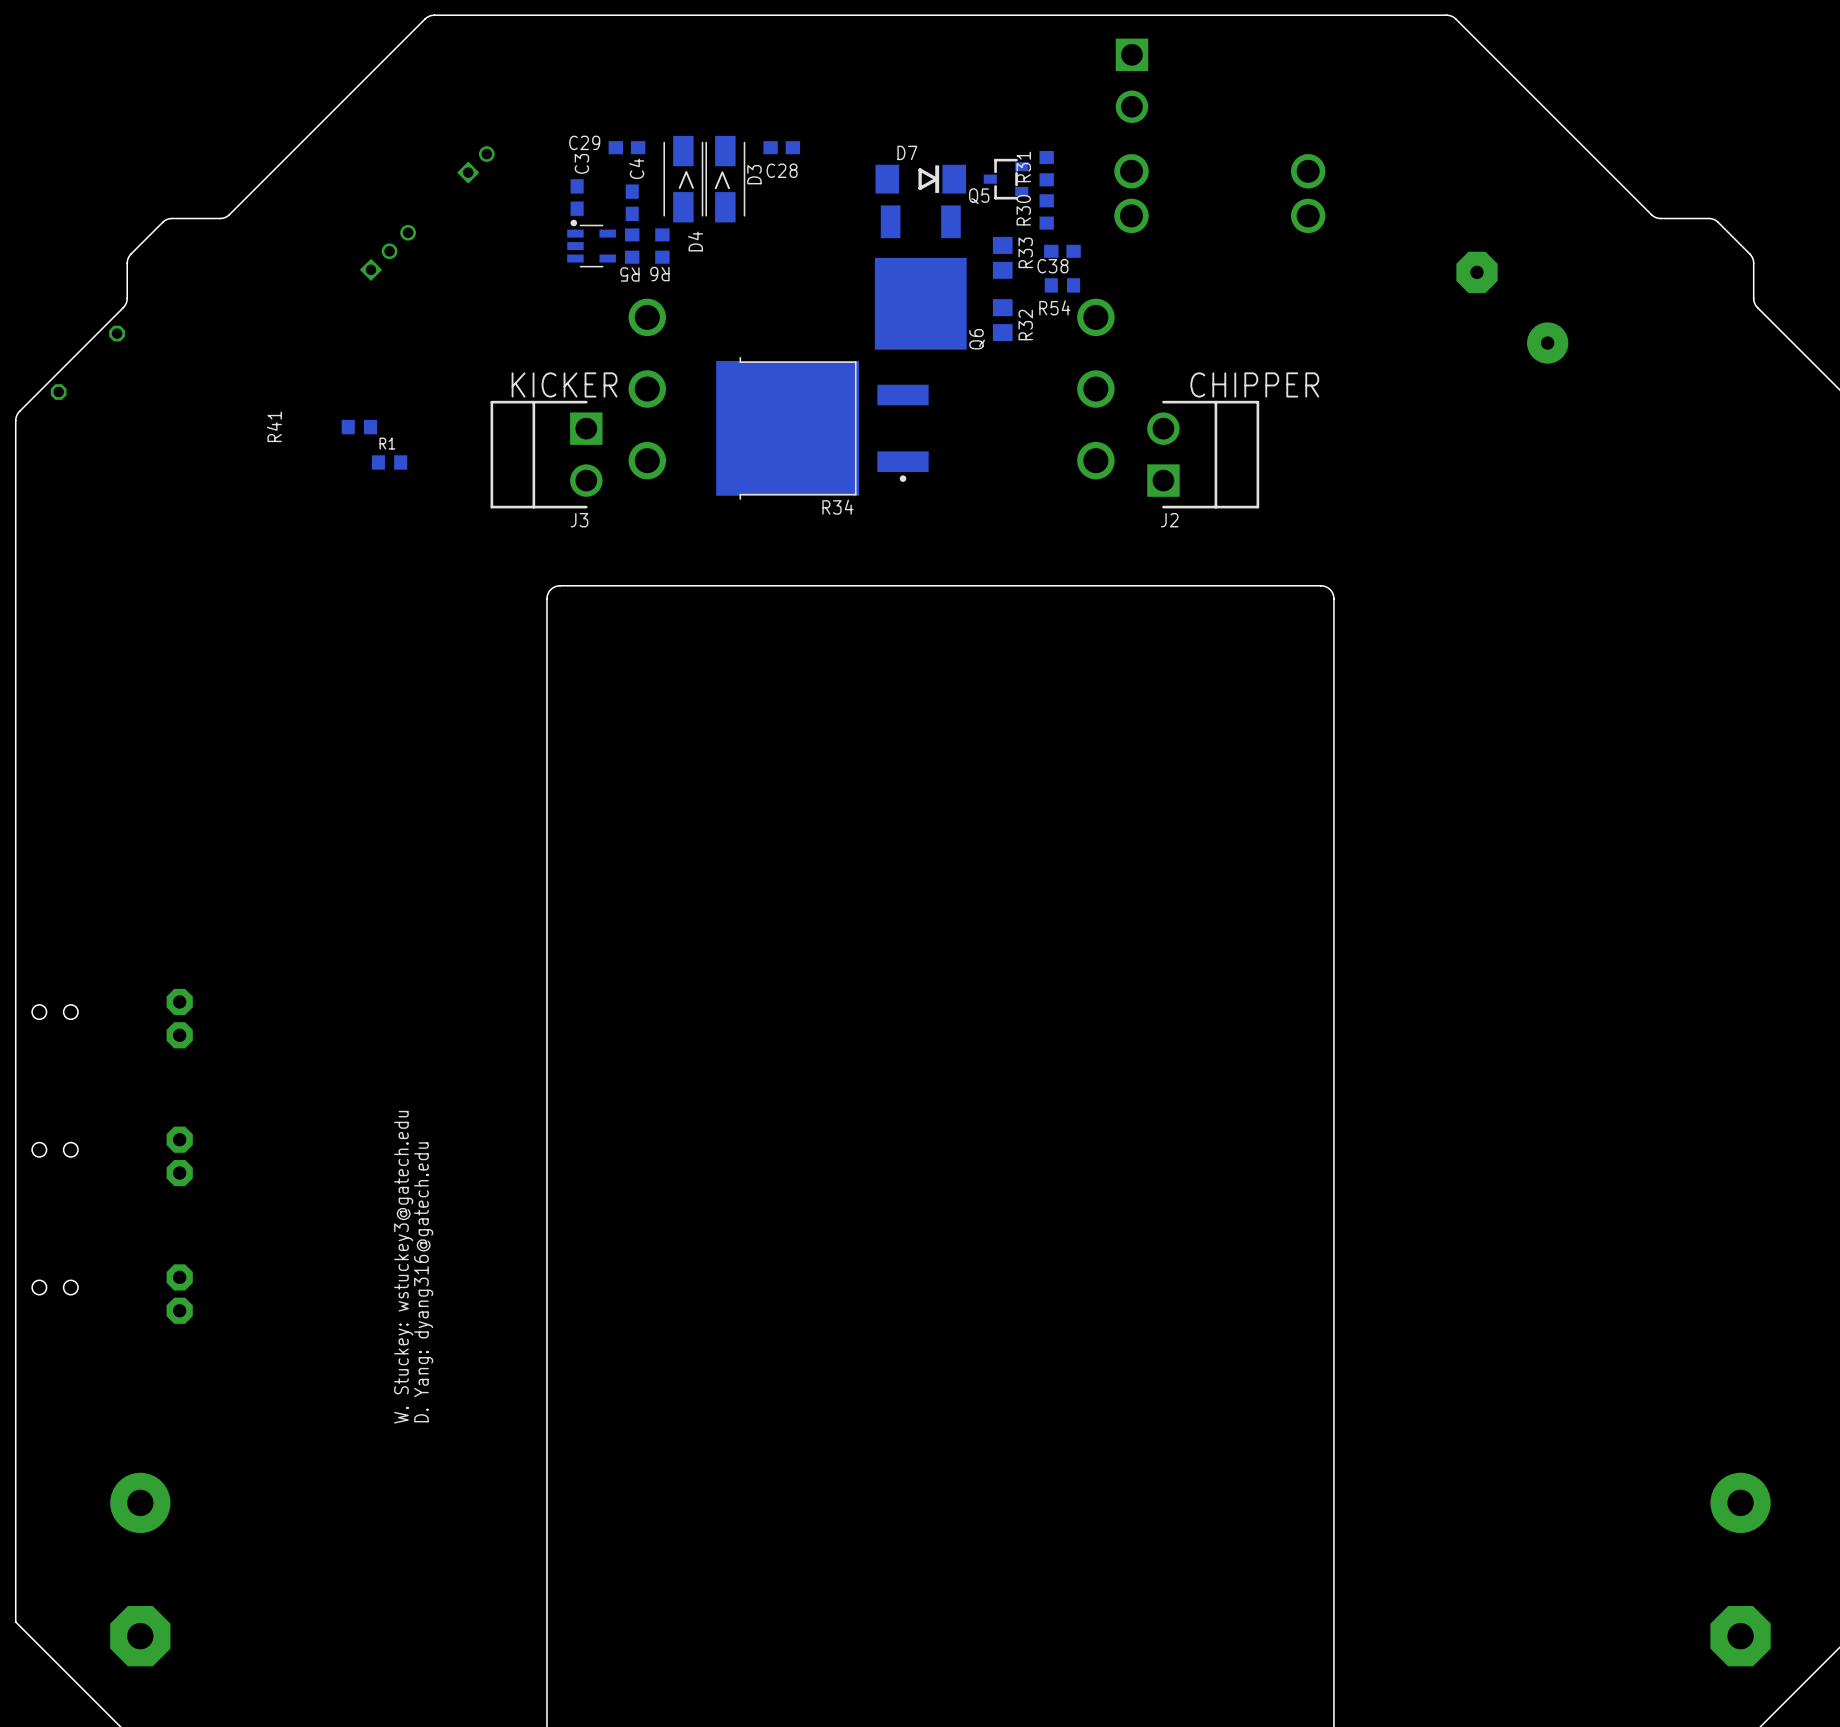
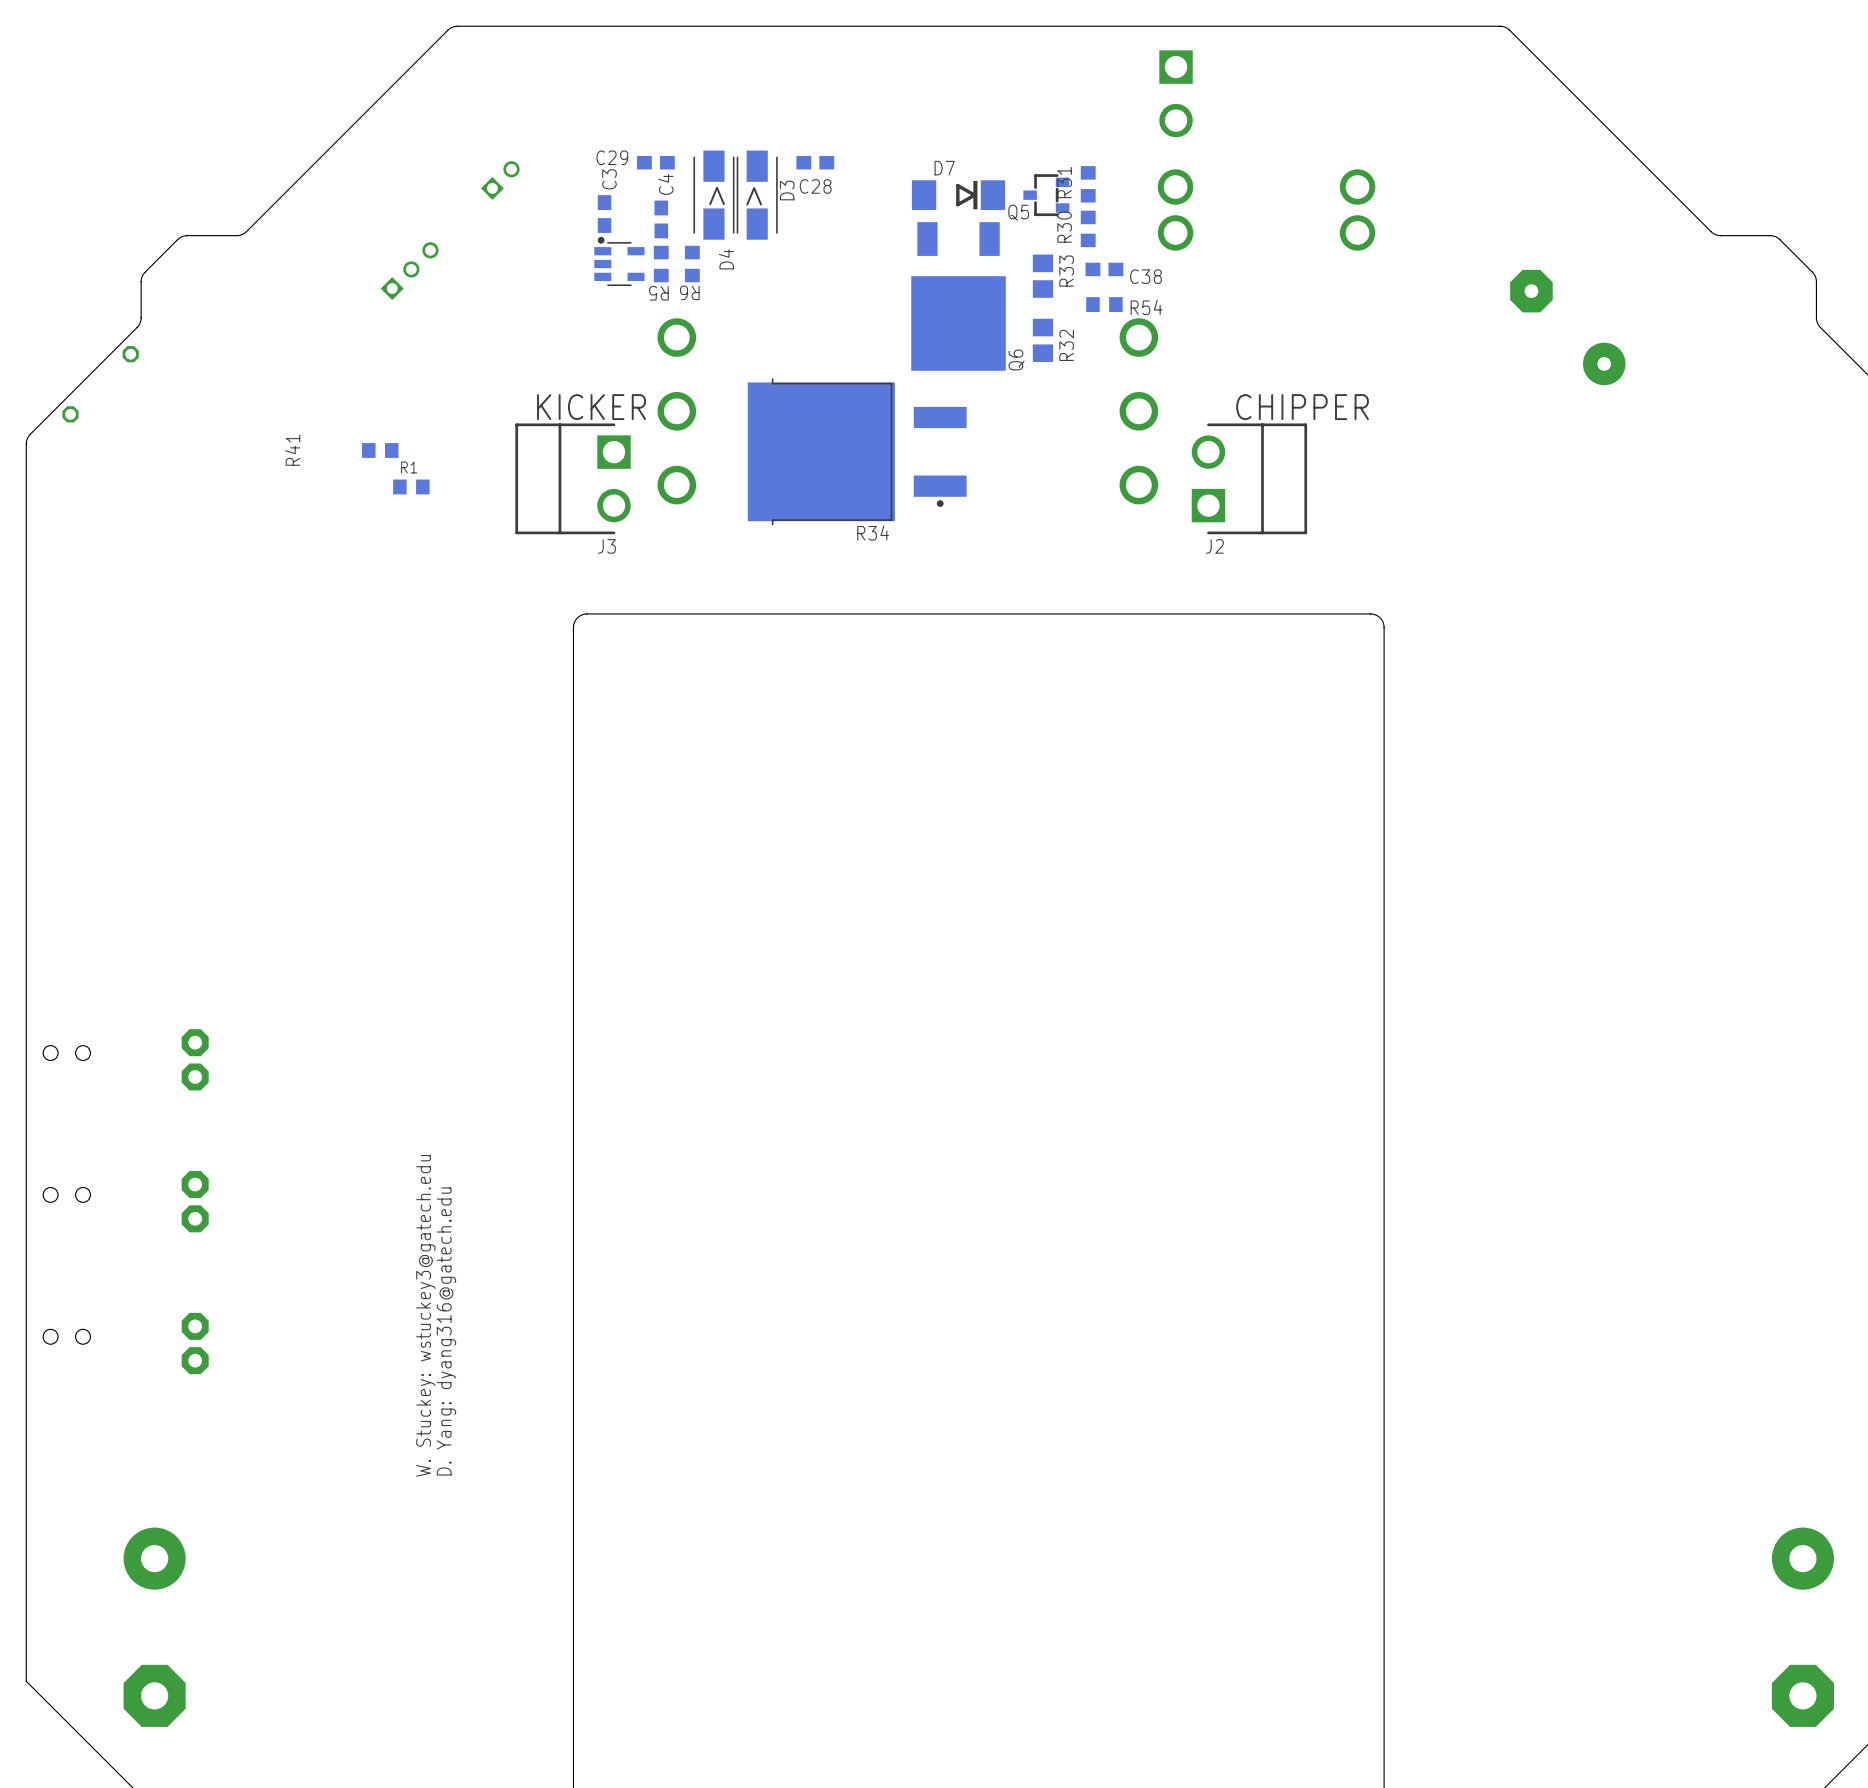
C38 name position: C38 (1052, 266) -> C38 (1145, 276)
R54 name position: R54 (1054, 307) -> R54 (1146, 307)

